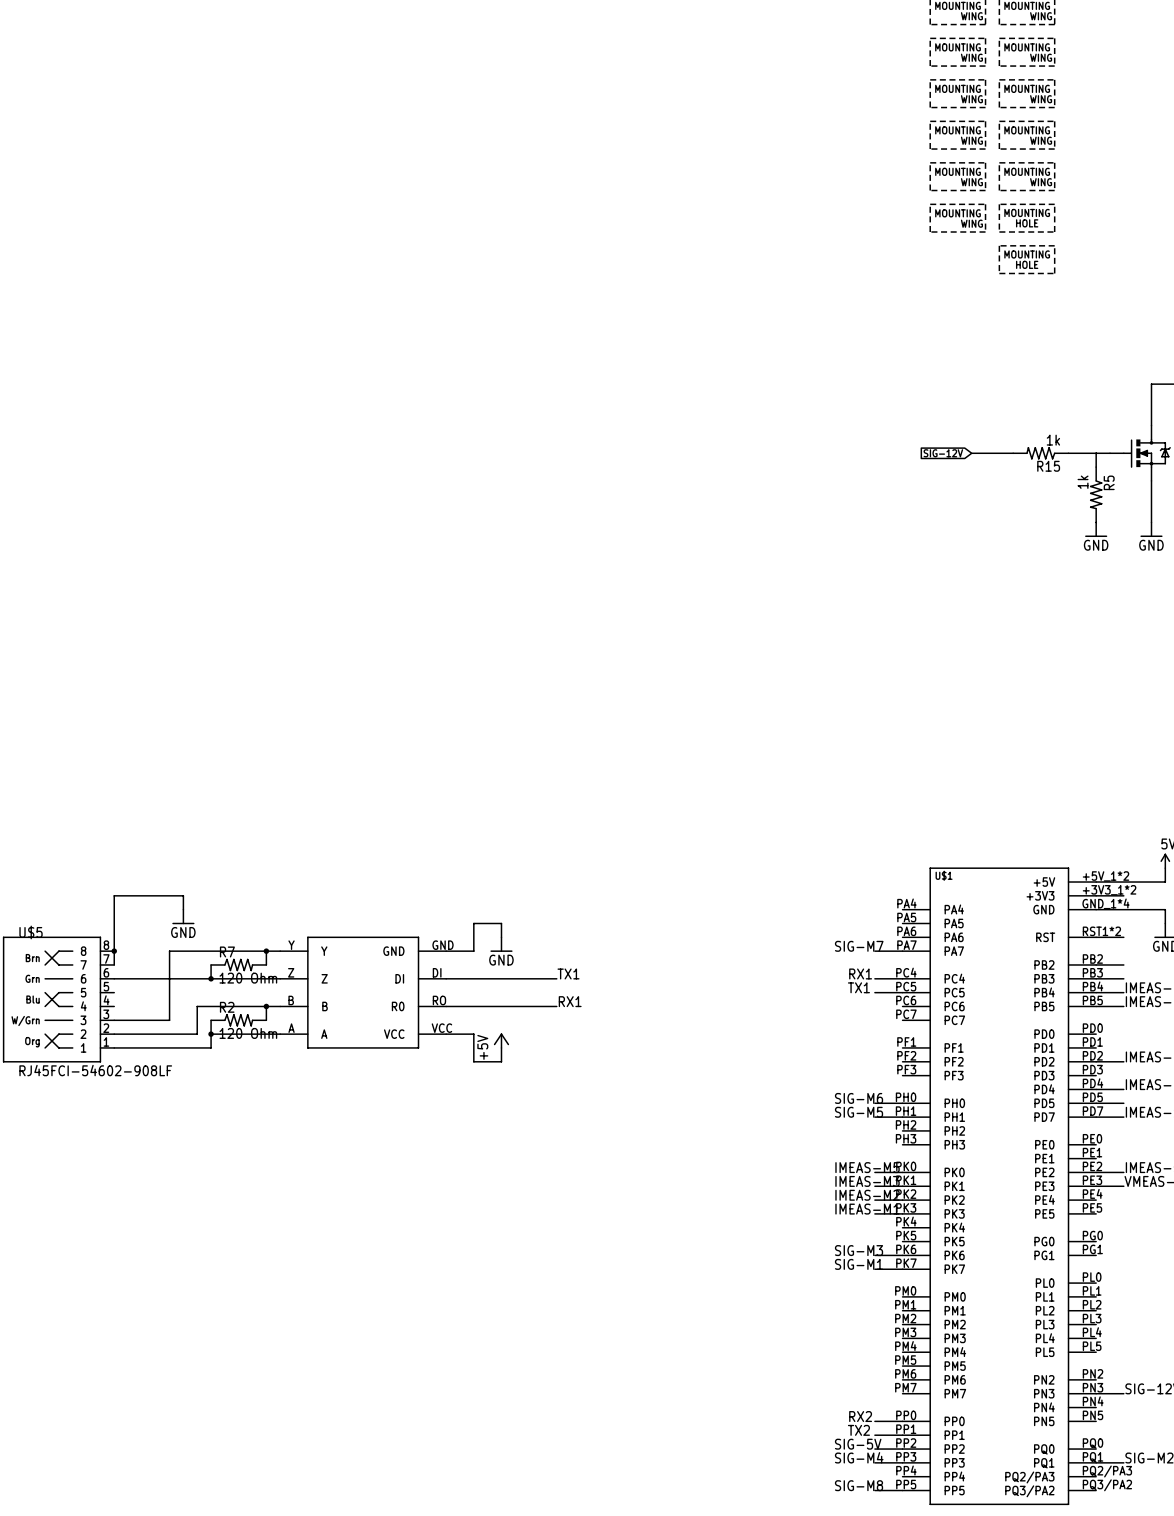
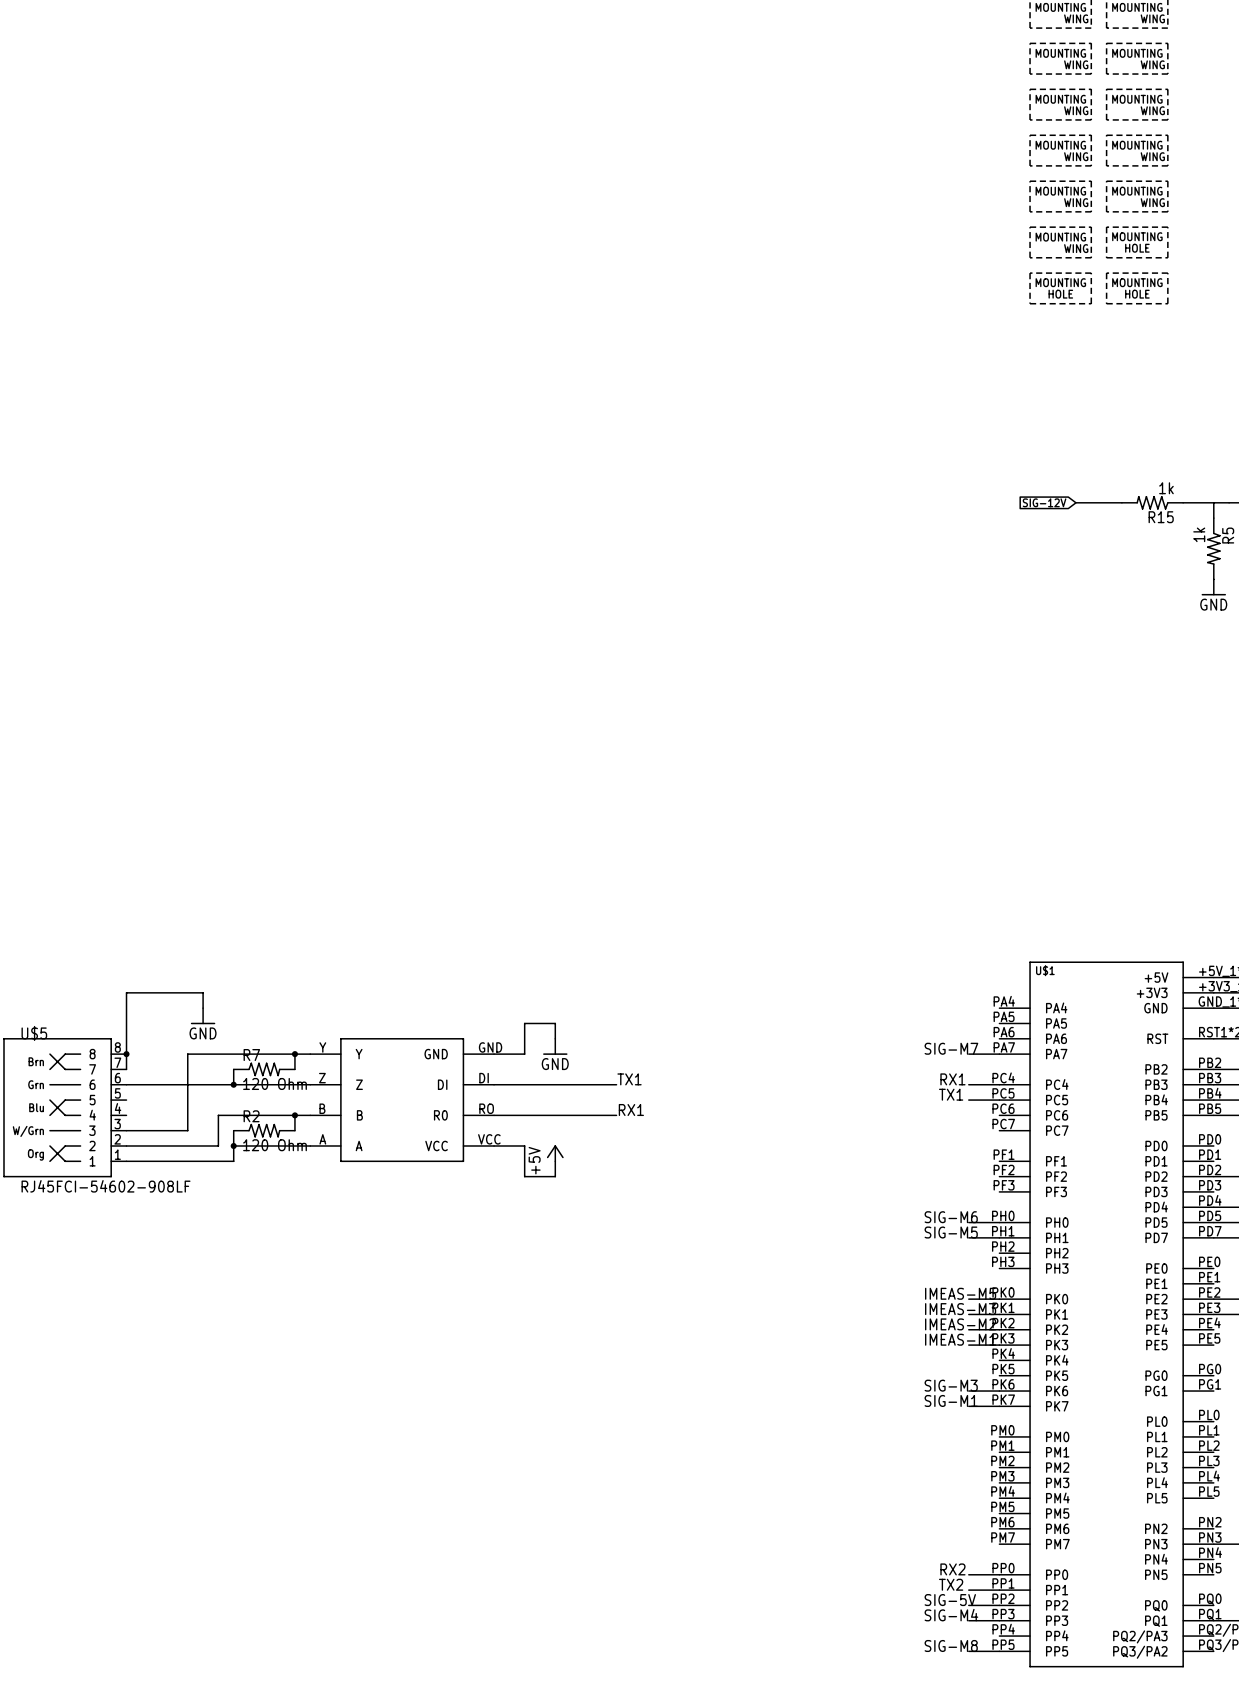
part: none -> (1060, 288)

